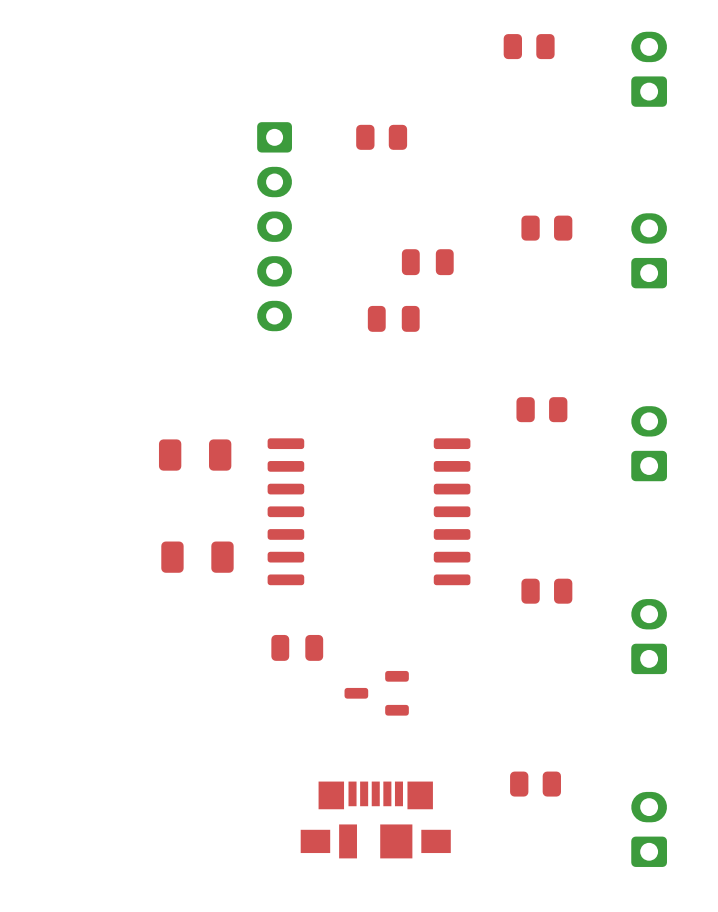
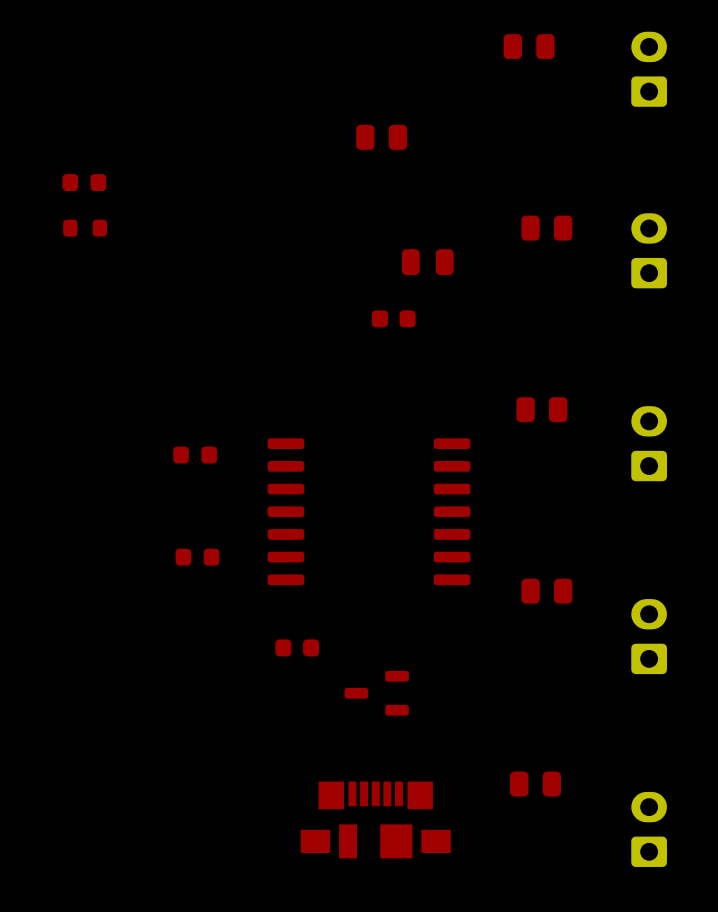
part: none -> (84, 182)
part: (274, 226) -> none
part: none -> (85, 228)
part footprint: [367, 305, 420, 332] -> [371, 310, 416, 328]
part footprint: [158, 439, 232, 471] -> [173, 446, 218, 464]
part footprint: [161, 541, 234, 573] -> [175, 548, 220, 566]
part footprint: [271, 634, 324, 661] -> [275, 639, 320, 657]

